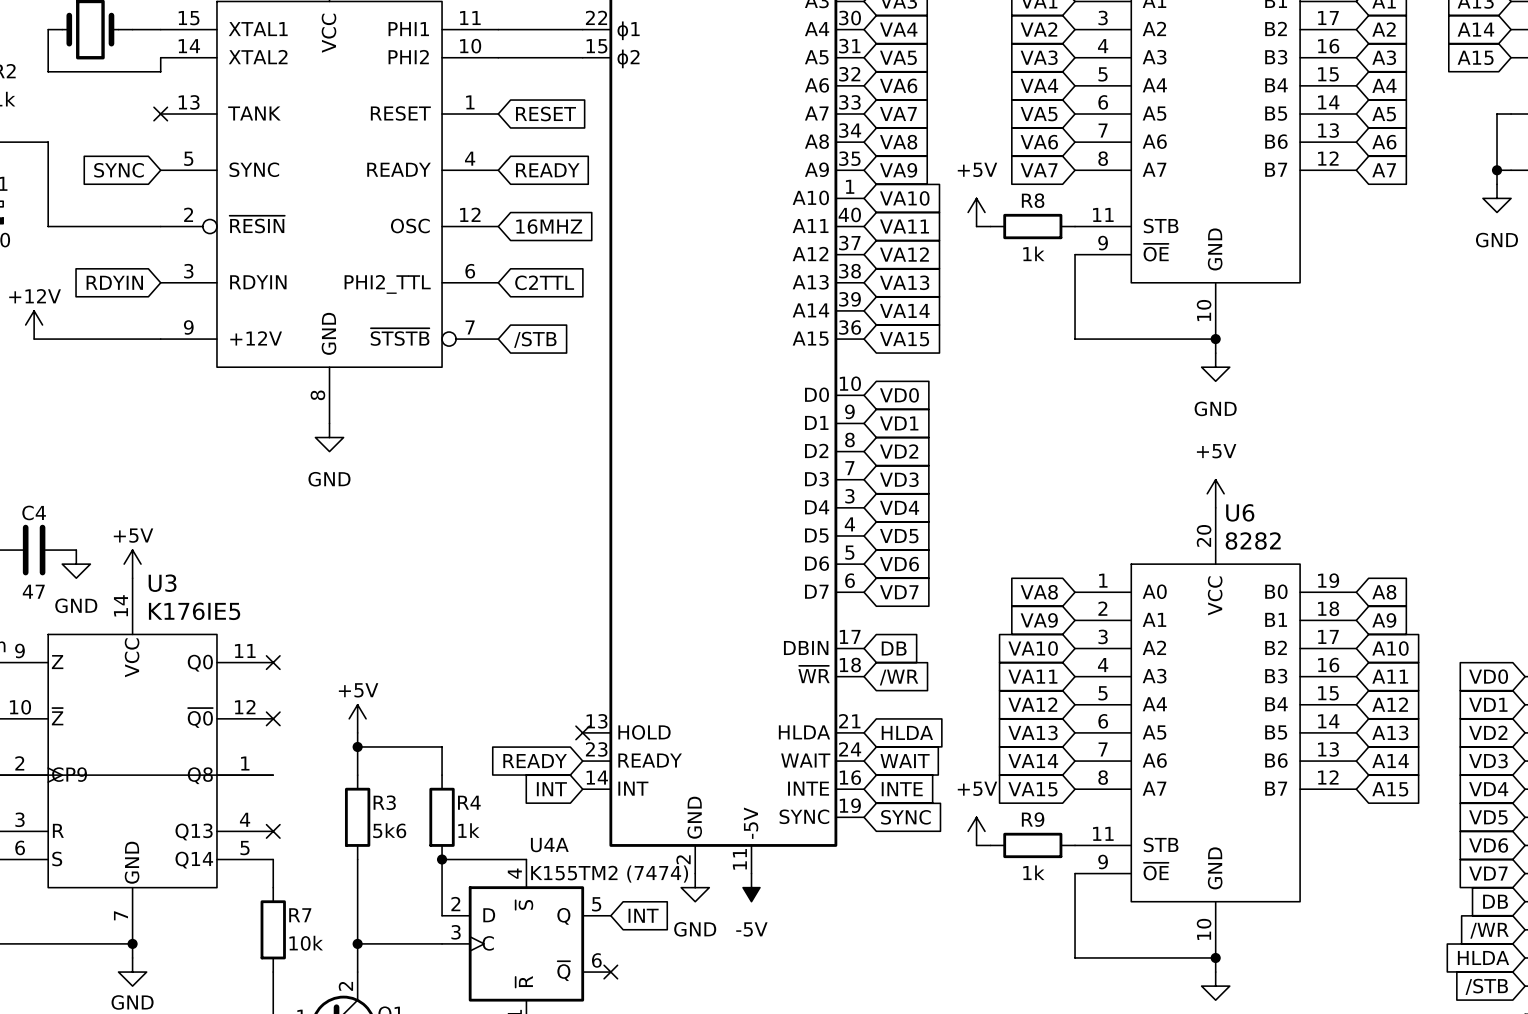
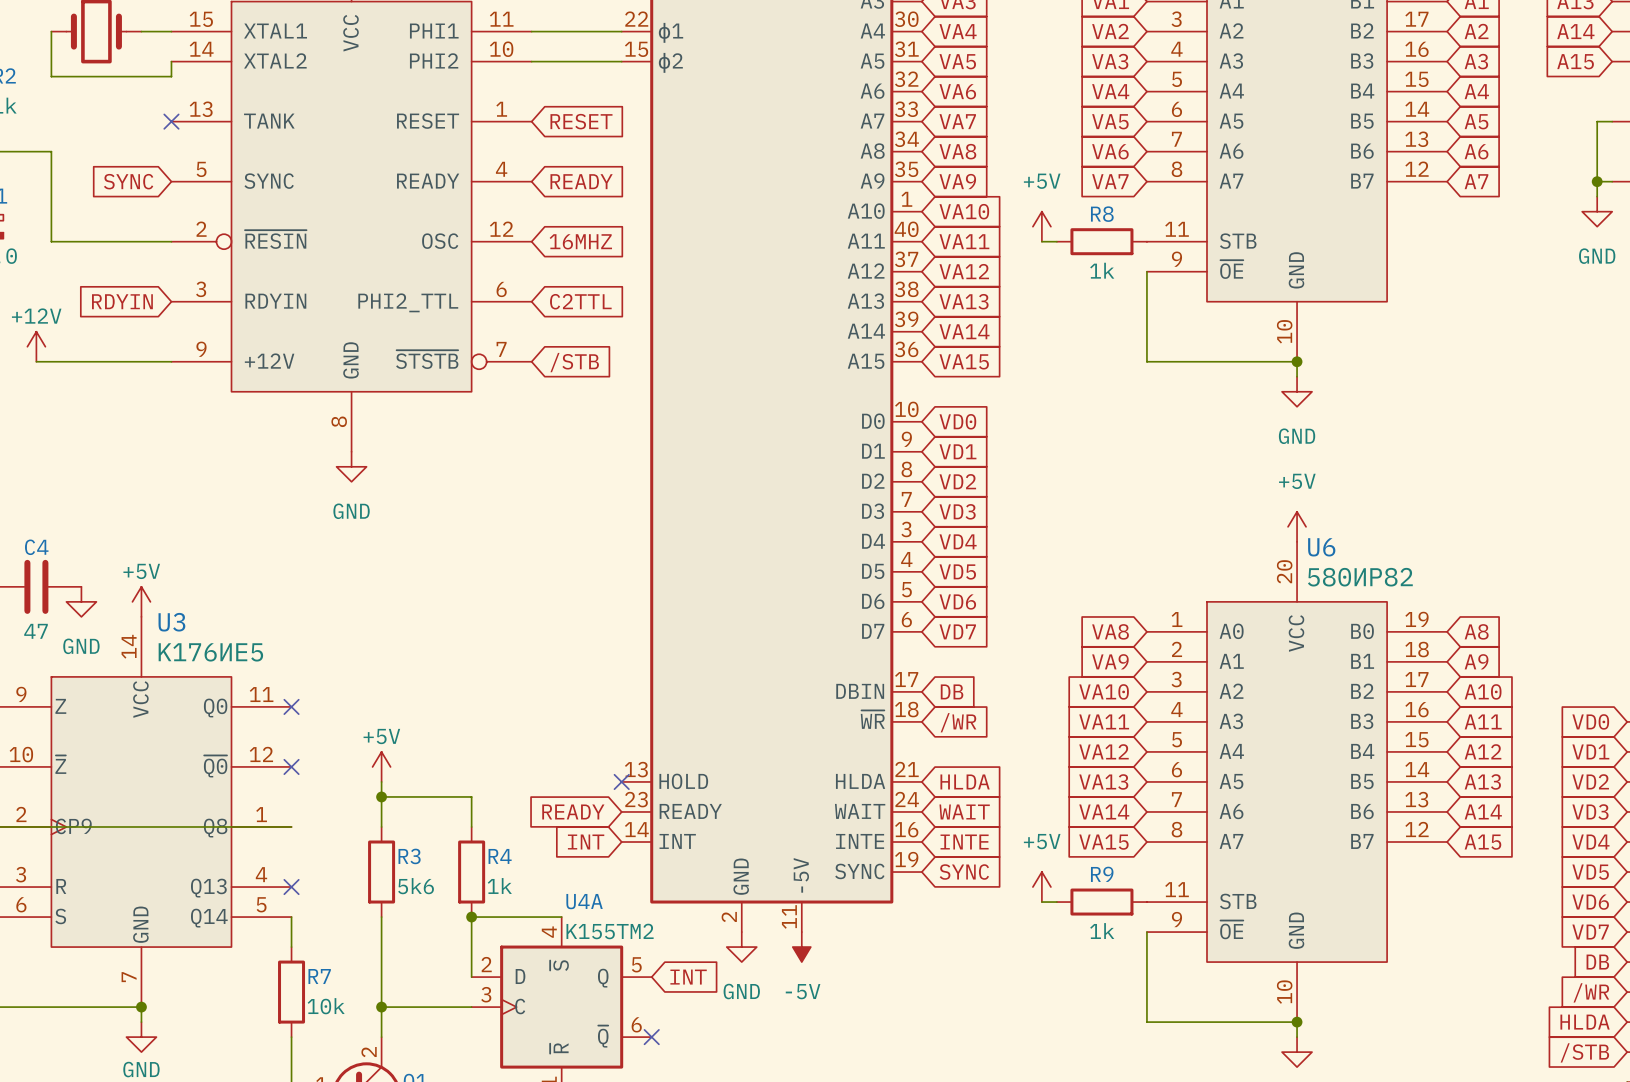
U6 value: 8282 (1253, 541) -> 580ИР82 (1360, 577)
U3 value: K176IE5 (194, 611) -> K176ИЕ5 (210, 652)
U4A value: K155TM2 (7474) (609, 874) -> K155ТМ2 (610, 931)

